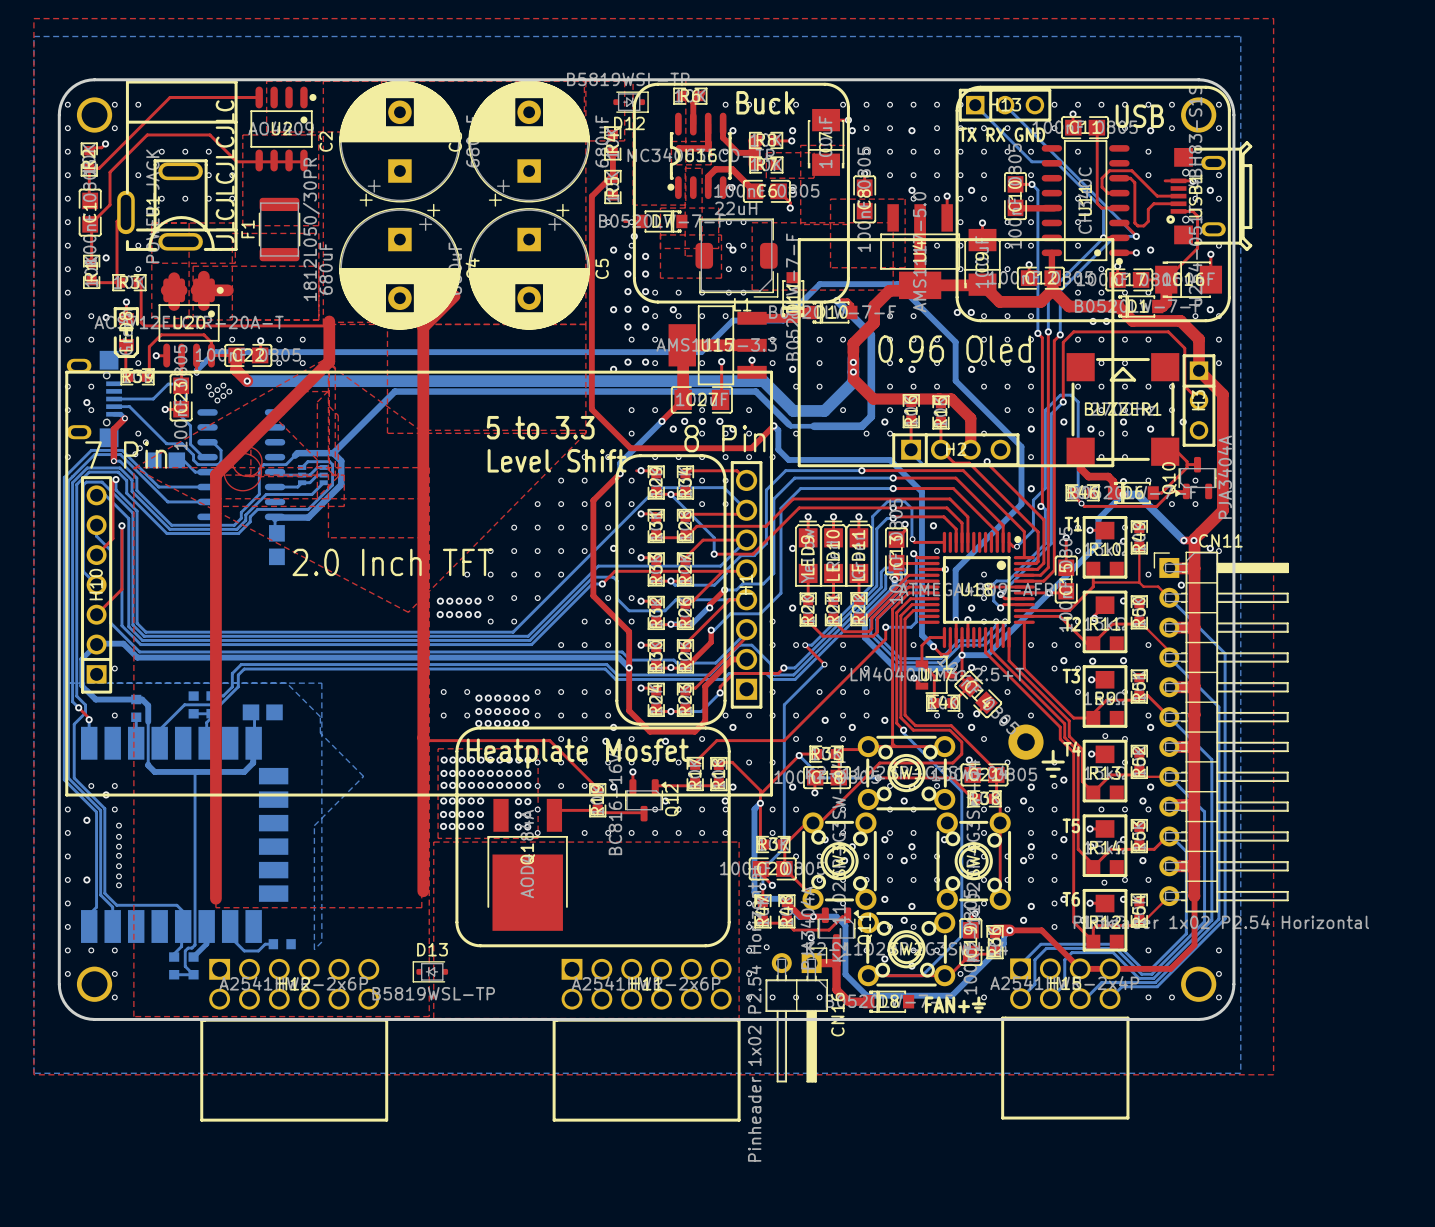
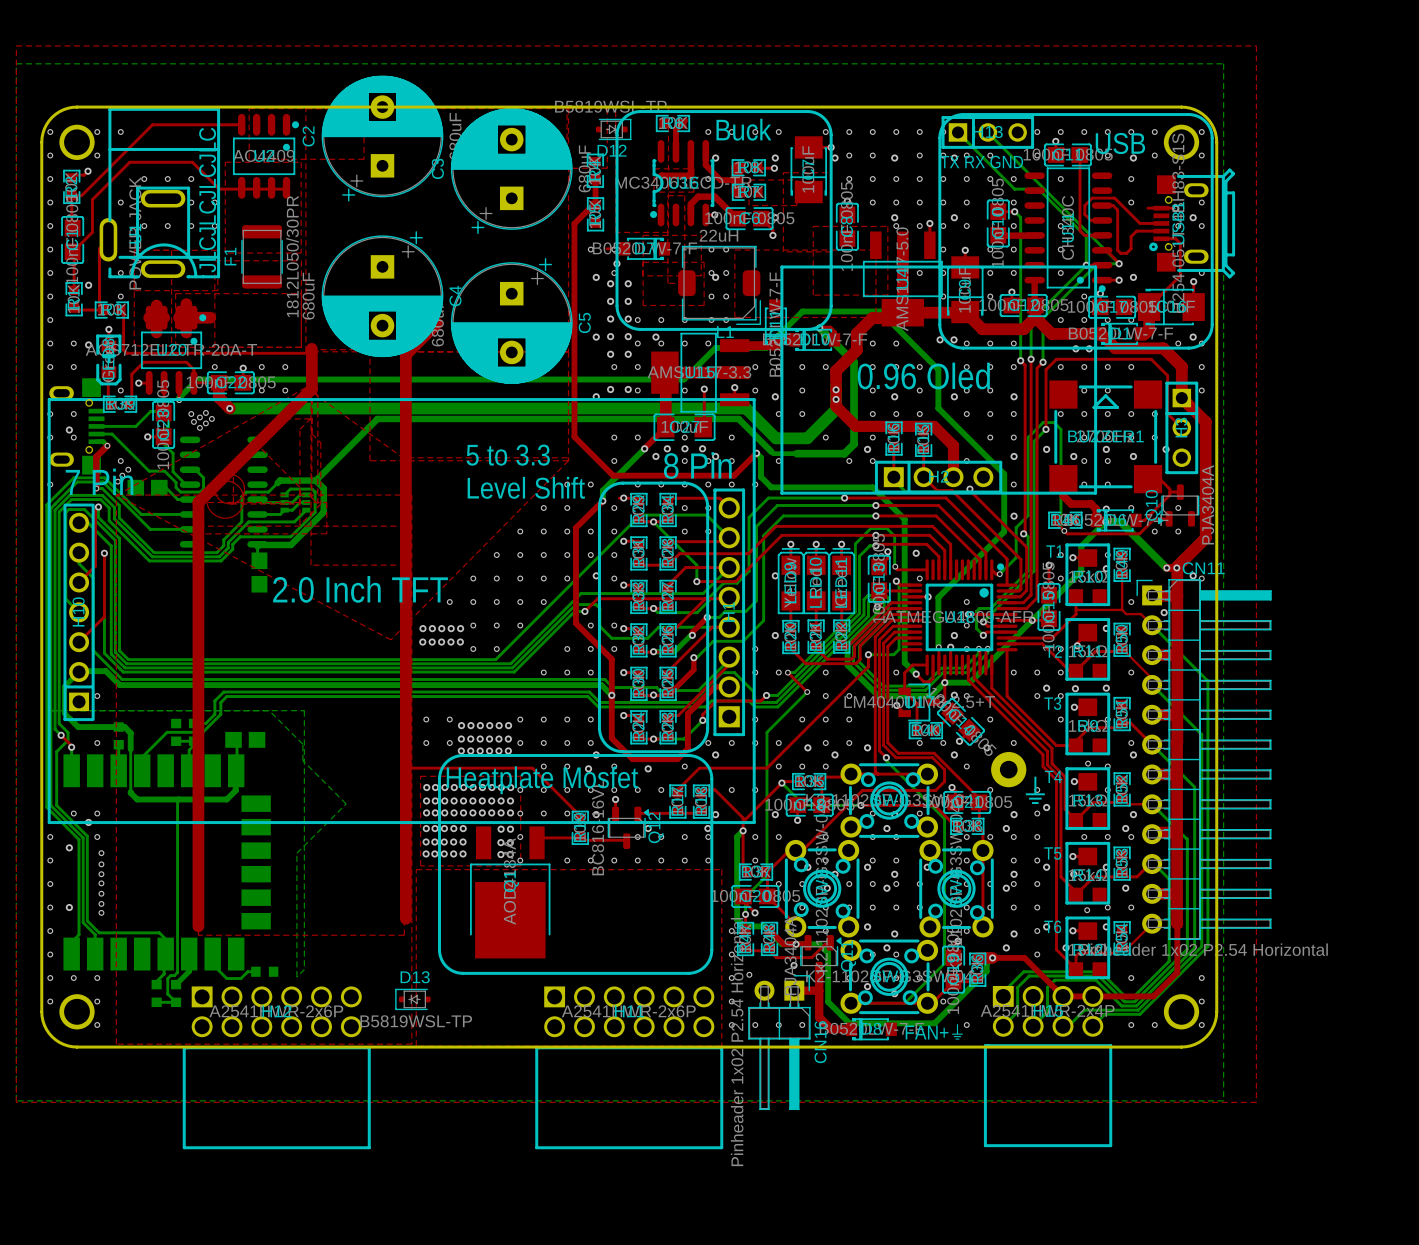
C2 position: (399, 143) -> (382, 138)
C5 position: (529, 266) -> (511, 320)

